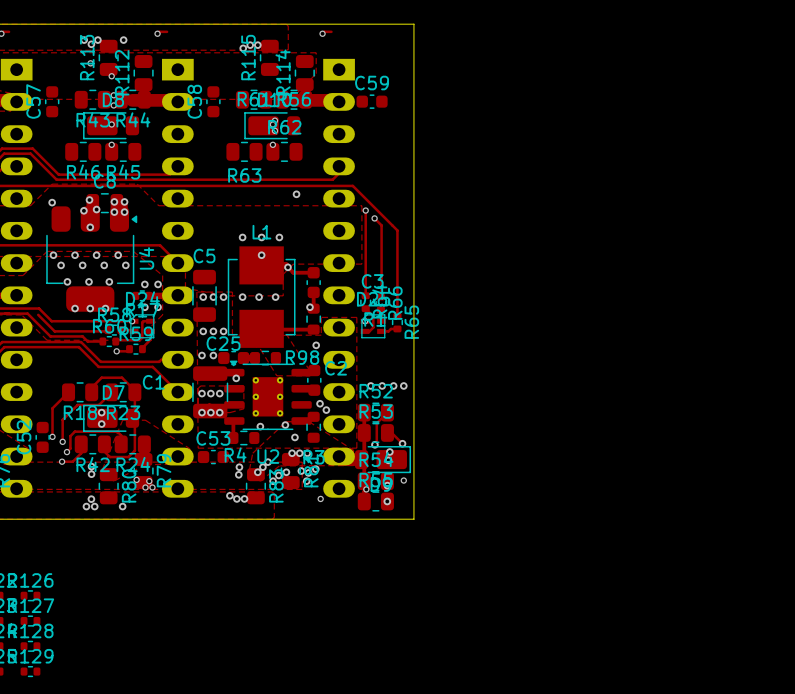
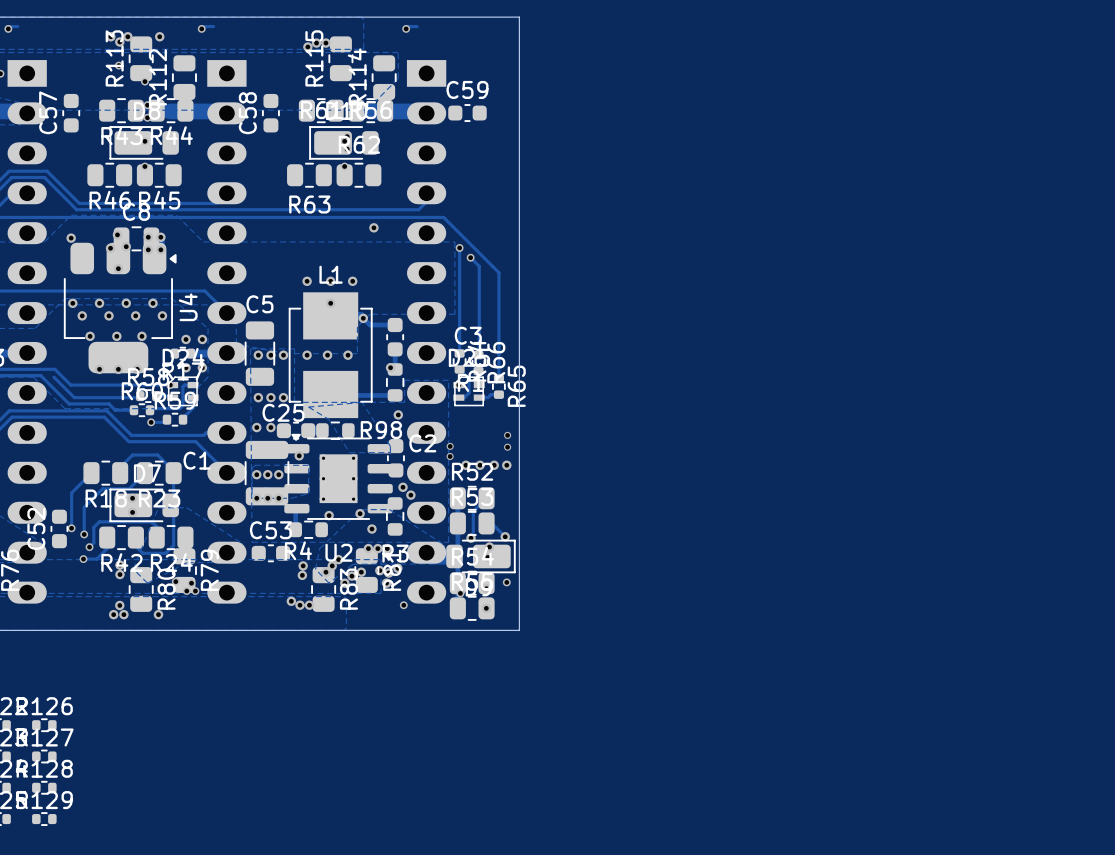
via: none -> (507, 435)
via: none -> (450, 446)
via: none -> (507, 447)
via: none -> (450, 456)

